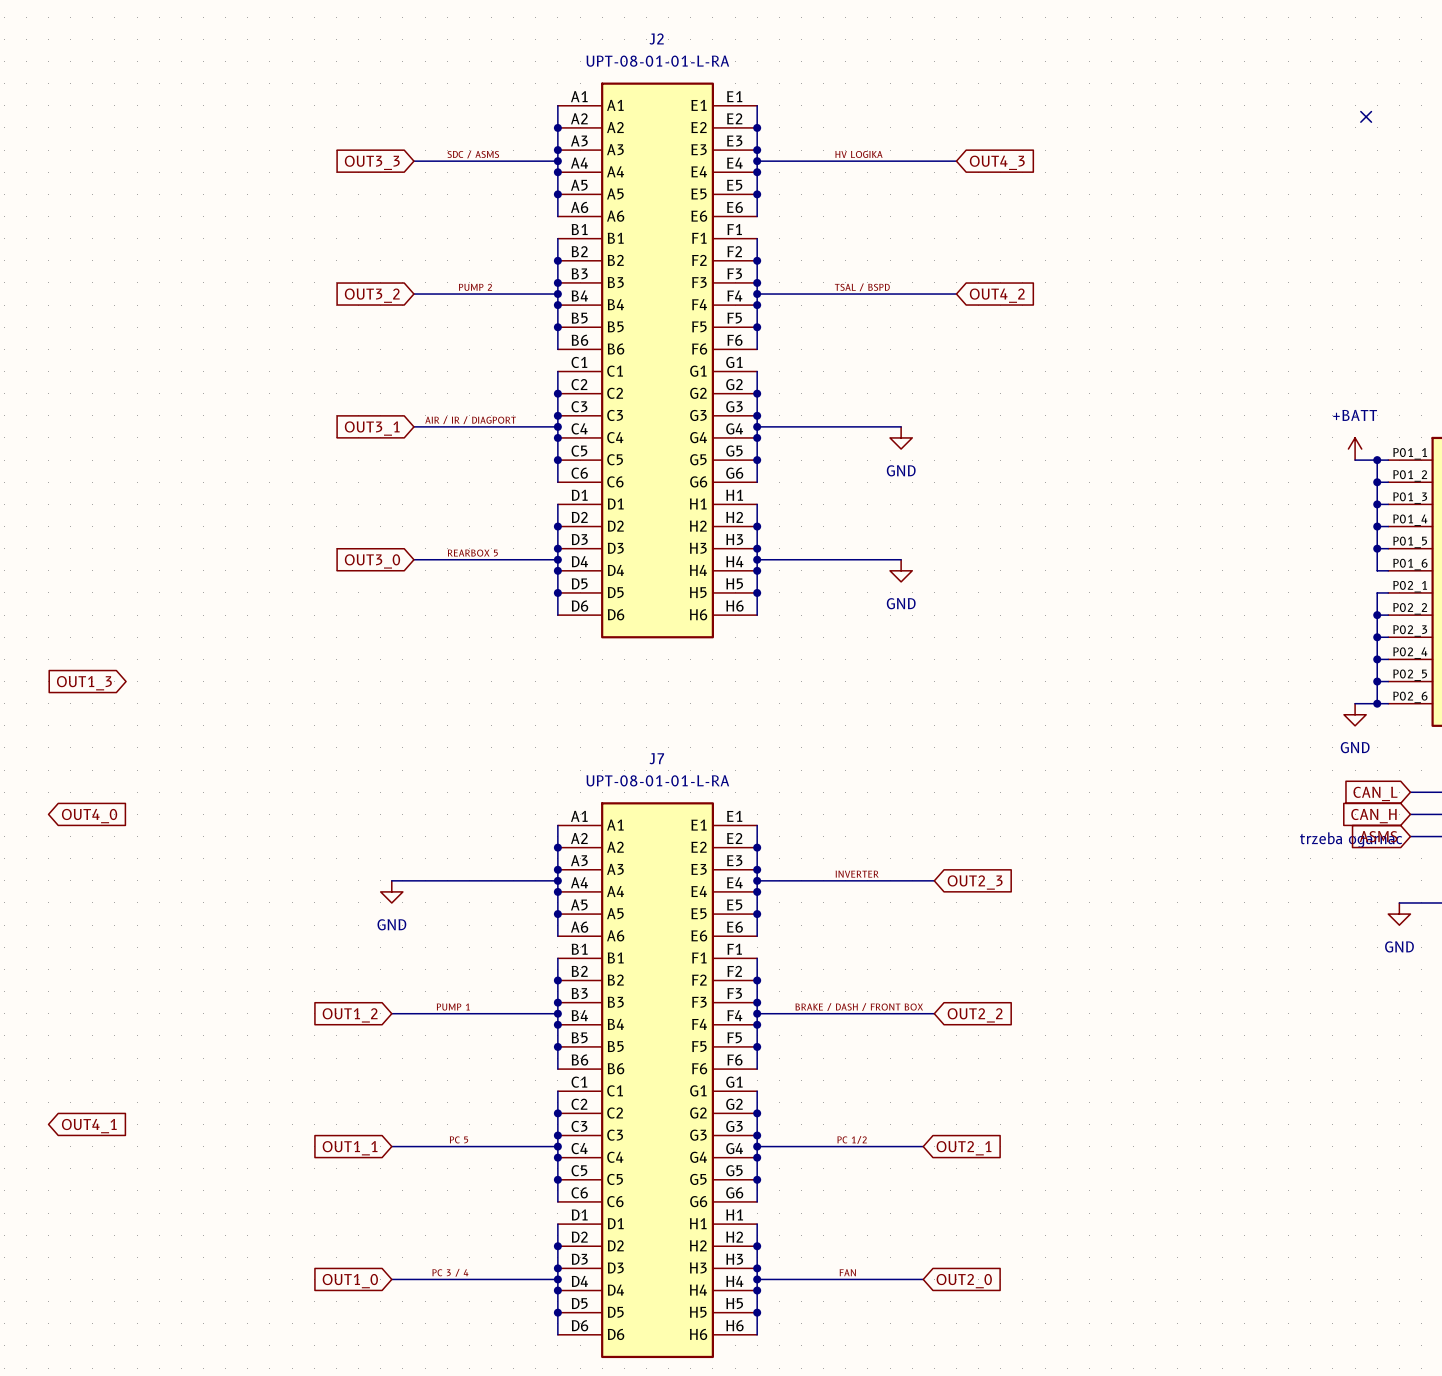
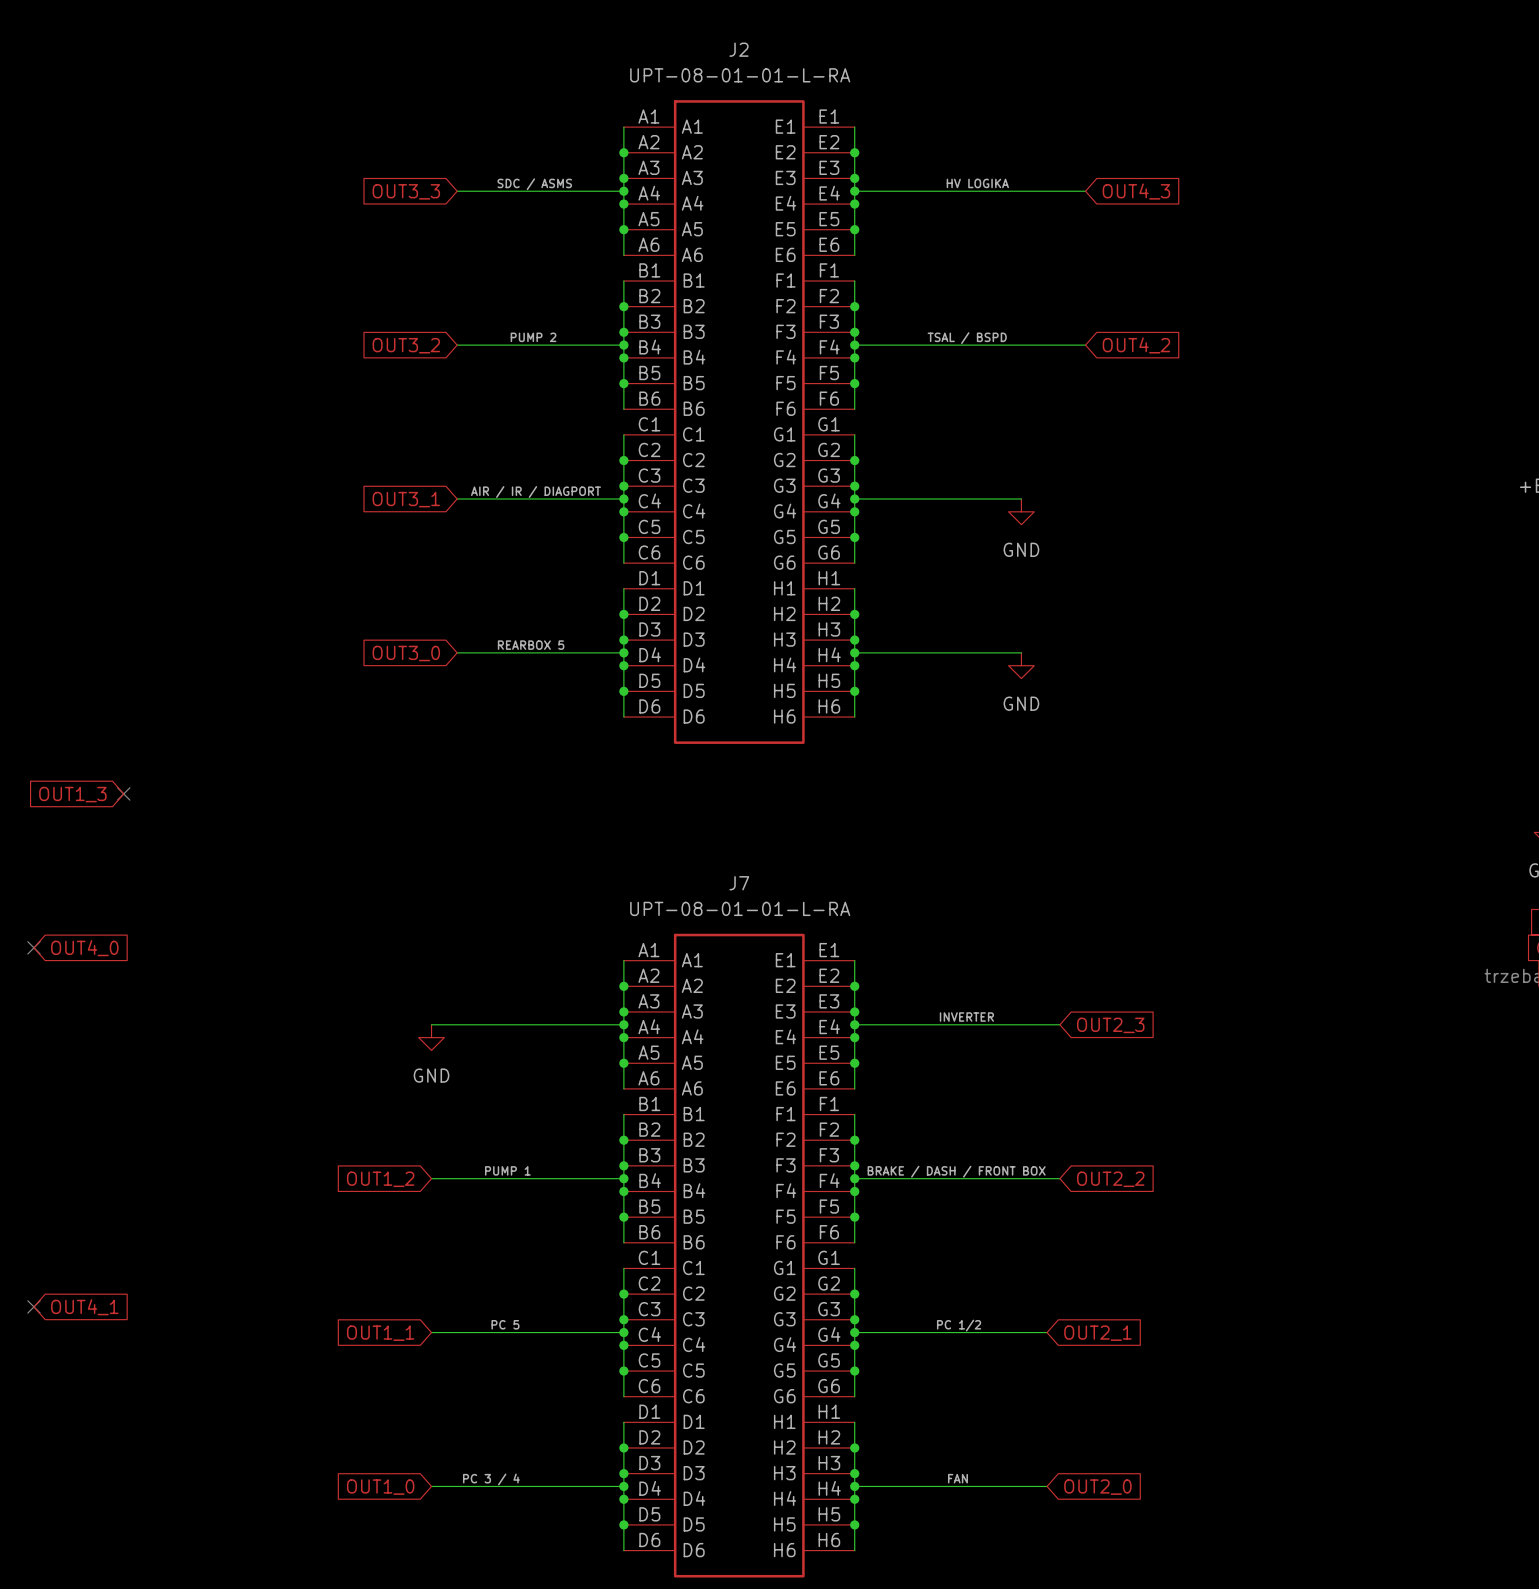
no-connect mark: none -> (123, 793)
no-connect mark: none -> (33, 947)
no-connect mark: none -> (33, 1306)

